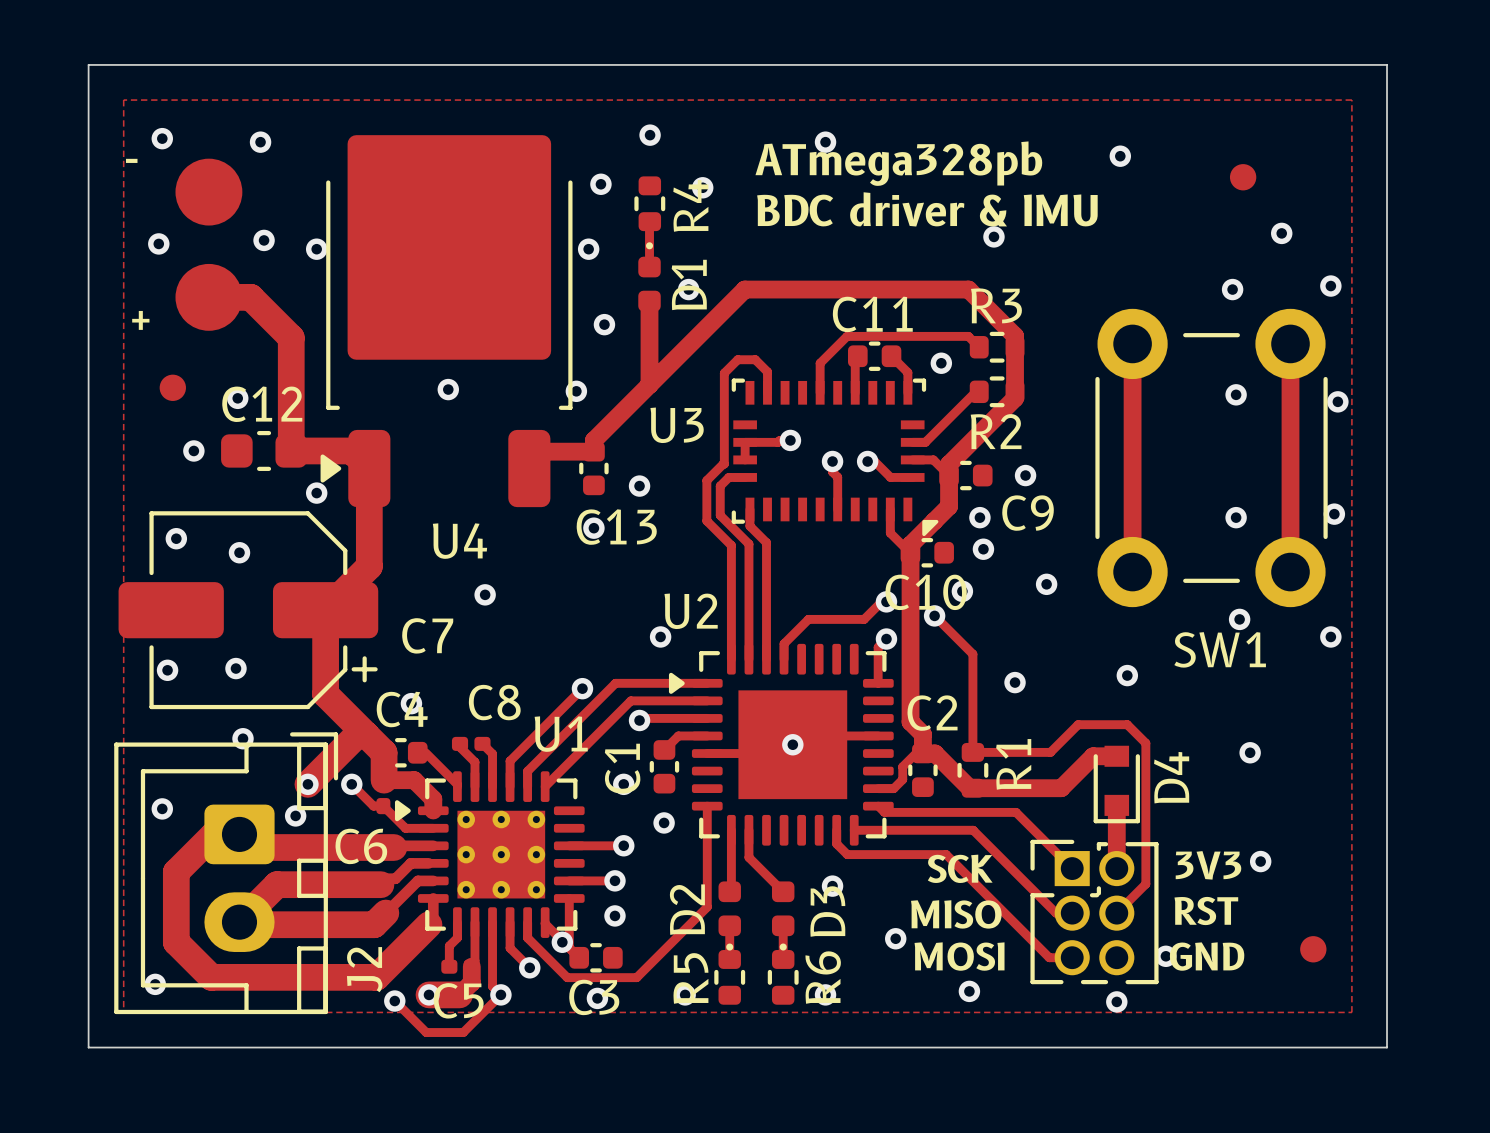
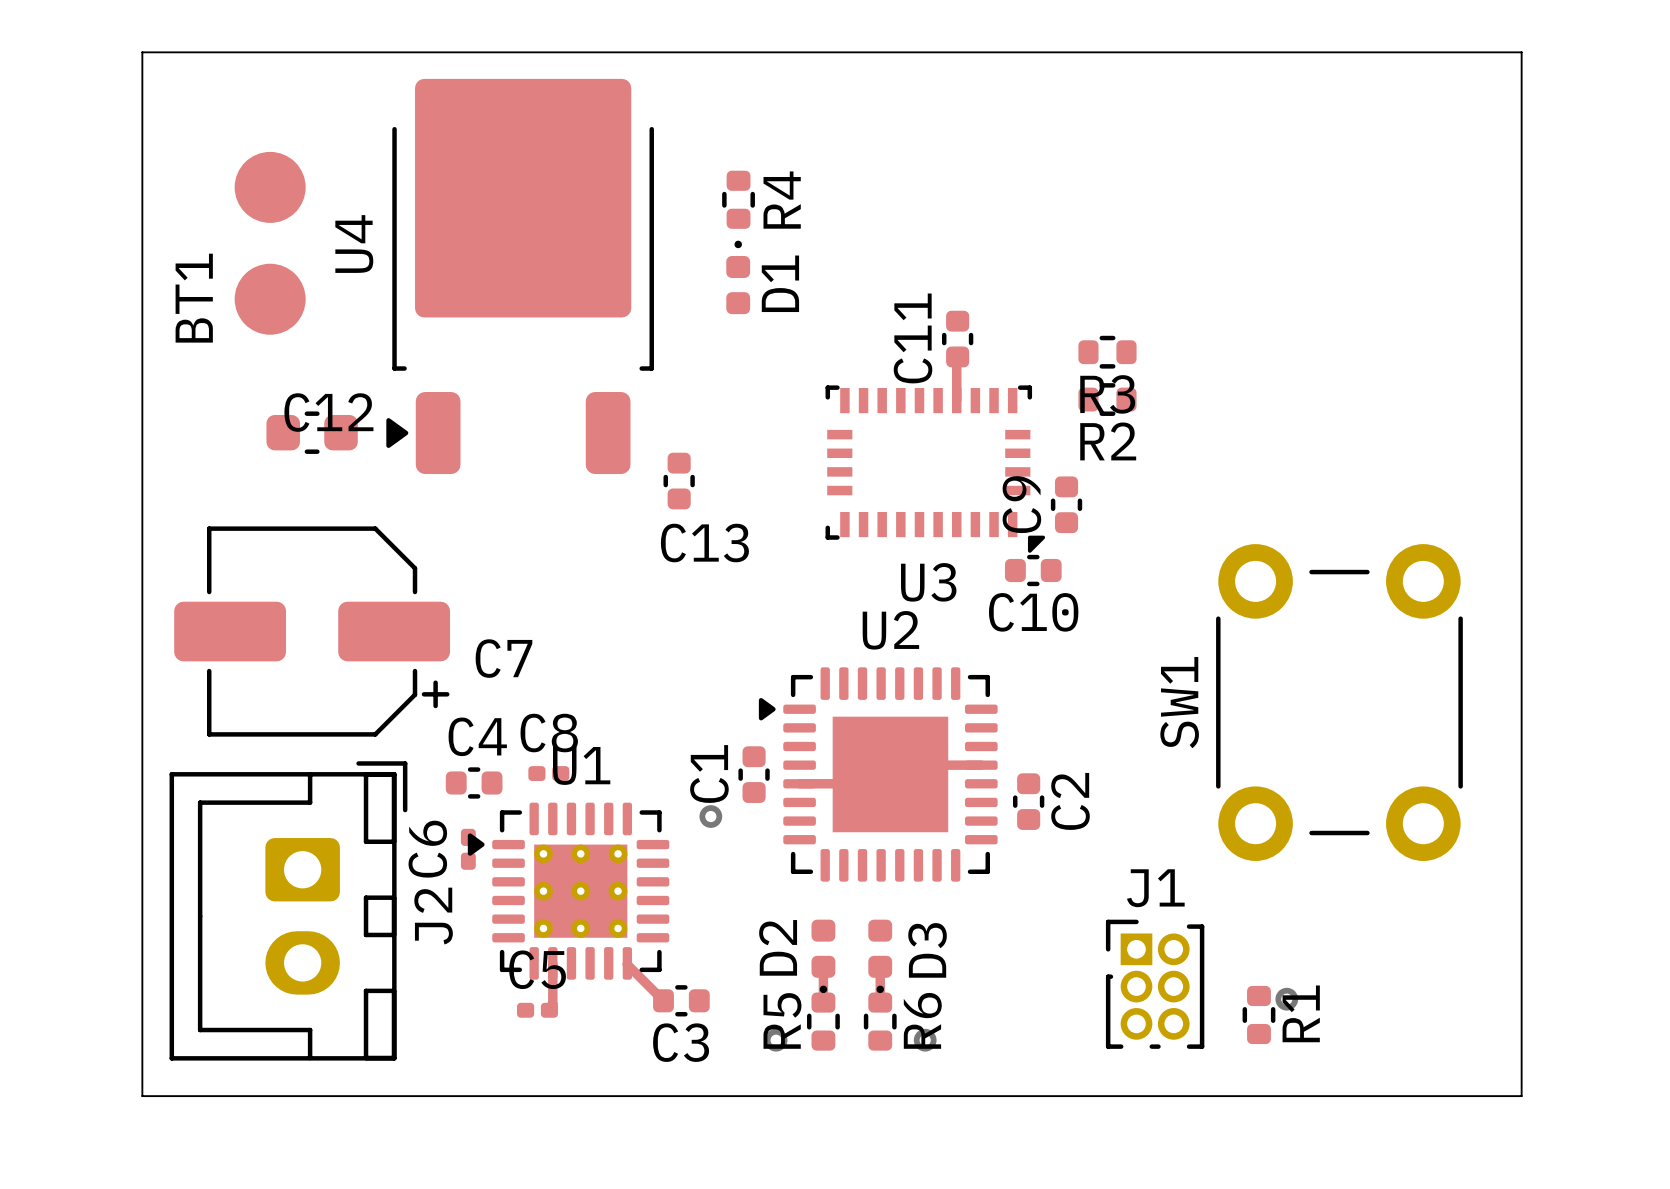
zone outline: (123, 100) (123, 1012) (1351, 1012) (1351, 100) (123, 100) -> none
via: (650, 135) -> none
via: (162, 138) -> none
via: (260, 142) -> none
via: (825, 142) -> none
via: (1120, 156) -> none
text: - (131, 160) -> none
text: ATmega328pb (898, 163) -> none
part: (1243, 177) -> none
via: (600, 184) -> none
via: (702, 187) -> none
text: BDC driver & IMU (927, 209) -> none
track: (649, 221) (649, 267) -> none
via: (1281, 233) -> none
via: (993, 236) -> none
via: (264, 240) -> none
via: (158, 243) -> none
via: (316, 249) -> none
via: (588, 249) -> none
via: (1330, 286) -> none
via: (688, 289) -> none
via: (1232, 289) -> none
track: (208, 297) (250, 297) (291, 337) (291, 450) (351, 450) (369, 468) (369, 566) (325, 610) (325, 694) (384, 752) (384, 780) -> none
BT1 name: none -> BT1 (194, 298)
track: (649, 301) (649, 384) -> none
R3 name position: R3 (996, 305) -> R3 (1107, 394)
text: + (140, 320) -> none
U4 position: (446, 321) -> (520, 276)
via: (604, 324) -> none
track: (1132, 343) (1132, 572) (1113, 591) -> none
track: (1290, 343) (1290, 572) -> none
track: (979, 347) (968, 336) (847, 336) (820, 363) (820, 392) -> none
C11 rotation: 0° (874, 356) -> 90° clockwise (957, 339)
track: (891, 356) (907, 372) (907, 392) -> none
via: (941, 363) -> none
part: (172, 387) -> none
via: (448, 389) -> none
via: (576, 391) -> none
track: (979, 391) (975, 391) (925, 442) (912, 442) -> none
track: (767, 392) (767, 371) (755, 359) (737, 359) (724, 373) (724, 464) (706, 480) (706, 520) (731, 545) (731, 659) -> none
via: (1236, 394) -> none
via: (237, 398) -> none
via: (1337, 401) -> none
U3 name position: U3 (677, 425) -> U3 (928, 582)
track: (790, 440) (745, 442) (745, 459) -> none
via: (790, 440) -> none
via: (193, 450) -> none
C12 position: (264, 450) -> (312, 432)
SW1 position: (1211, 457) -> (1339, 702)
track: (912, 459) (933, 459) (949, 475) -> none
track: (832, 461) (832, 472) (837, 477) (837, 509) -> none
via: (832, 461) -> none
track: (867, 461) (874, 461) (890, 477) (912, 477) -> none
via: (867, 461) -> none
track: (529, 468) (546, 451) (593, 451) (593, 440) (744, 289) (968, 289) (1015, 336) (1015, 398) (949, 464) (949, 506) (910, 544) (910, 721) (922, 734) (922, 753) -> none
C9 rotation: 0° (965, 475) -> 90° clockwise (1066, 504)
via: (1025, 475) -> none
track: (745, 477) (728, 477) (720, 486) (720, 515) (748, 544) (748, 659) -> none
via: (639, 486) -> none
via: (316, 493) -> none
track: (749, 509) (749, 526) (766, 542) (766, 659) -> none
track: (890, 509) (890, 533) (910, 553) -> none
via: (1334, 514) -> none
via: (979, 517) -> none
via: (1236, 517) -> none
via: (593, 528) -> none
via: (176, 538) -> none
U4 name rotation: 0° (459, 541) -> 90° counterclockwise (354, 244)
U4 name position: U4 (459, 541) -> U4 (354, 244)
via: (983, 549) -> none
via: (239, 552) -> none
via: (1046, 584) -> none
via: (962, 591) -> none
via: (485, 594) -> none
track: (886, 601) (881, 601) (864, 619) (808, 619) (784, 643) (784, 659) -> none
via: (886, 601) -> none
U2 name position: U2 (691, 611) -> U2 (890, 630)
track: (934, 615) (972, 654) (972, 752) (1050, 752) (1078, 724) (1127, 724) (1145, 743) (1145, 884) (1116, 913) -> none
via: (934, 615) -> none
via: (1239, 619) -> none
via: (660, 636) -> none
via: (1330, 636) -> none
track: (886, 639) (878, 647) (878, 683) -> none
via: (886, 639) -> none
SW1 name rotation: 0° (1220, 649) -> 90° counterclockwise (1179, 702)
SW1 name position: SW1 (1220, 649) -> SW1 (1179, 702)
via: (235, 668) -> none
via: (167, 670) -> none
via: (1127, 675) -> none
via: (1015, 682) -> none
track: (707, 683) (615, 683) (527, 771) (527, 786) -> none
track: (582, 688) (510, 761) (510, 786) -> none
via: (582, 688) -> none
track: (707, 700) (630, 700) (545, 786) -> none
C8 name position: C8 (494, 702) -> C8 (549, 733)
via: (411, 703) -> none
C2 name rotation: 0° (932, 713) -> 90° counterclockwise (1070, 801)
track: (707, 718) (641, 718) (639, 720) -> none
via: (639, 720) -> none
track: (366, 734) (357, 734) (307, 784) -> none
U1 name position: U1 (561, 734) -> U1 (581, 765)
track: (707, 735) (678, 735) (664, 749) -> none
via: (243, 738) -> none
track: (460, 743) (460, 747) (474, 762) (474, 786) -> none
track: (482, 743) (492, 753) (492, 786) -> none
via: (792, 744) -> none
track: (425, 752) (457, 786) -> none
via: (1250, 752) -> none
track: (922, 753) (916, 753) (902, 766) (902, 779) (893, 788) (878, 788) -> none
track: (922, 753) (935, 753) (969, 788) (1061, 788) (1093, 756) (1116, 756) -> none
R1 name position: R1 (1013, 764) -> R1 (1301, 1013)
C1 position: (664, 766) -> (754, 774)
R1 position: (972, 770) -> (1258, 1015)
track: (383, 780) (414, 780) (433, 799) (433, 810) -> none
via: (307, 784) -> none
track: (351, 784) (373, 806) (383, 806) (405, 828) (433, 828) -> none
via: (351, 784) -> none
D4: (1116, 784) -> none
C6 position: (383, 794) -> (468, 849)
track: (1116, 805) (1116, 868) -> none
track: (707, 806) (707, 907) (636, 977) (567, 977) (527, 937) (527, 922) -> none
track: (878, 806) (884, 812) (1016, 812) (1072, 868) -> none
via: (162, 808) -> none
via: (295, 815) -> none
via: (664, 822) -> none
track: (731, 830) (731, 890) (729, 891) -> none
track: (748, 830) (748, 857) (783, 891) -> none
track: (836, 830) (836, 843) (847, 854) (946, 854) (1049, 957) (1072, 957) -> none
track: (854, 830) (973, 830) (1056, 913) (1072, 913) -> none
track: (433, 845) (252, 847) (239, 834) (213, 834) (176, 872) (176, 942) (211, 977) (376, 977) (433, 920) (433, 898) -> none
track: (569, 845) (623, 845) -> none
via: (623, 845) -> none
C6 name rotation: 0° (361, 846) -> 90° counterclockwise (427, 849)
via: (1260, 861) -> none
track: (428, 863) (410, 863) (395, 878) (386, 878) -> none
text: 3V3 (1208, 865) -> none
text: SCK (960, 868) -> none
track: (433, 880) (417, 880) (385, 913) -> none
track: (569, 880) (614, 880) -> none
via: (614, 880) -> none
track: (380, 884) (276, 884) (239, 922) (242, 924) (374, 924) (385, 913) -> none
via: (832, 886) -> none
track: (569, 898) (569, 947) -> none
part: (1094, 911) -> none
text: RST (1206, 911) -> none
text: MISO (956, 914) -> none
via: (614, 915) -> none
track: (457, 922) (457, 937) (449, 946) (449, 966) -> none
track: (492, 922) (492, 986) (500, 994) (463, 1032) (426, 1032) (394, 1001) -> none
track: (510, 922) (510, 948) (529, 967) -> none
via: (895, 938) -> none
via: (562, 942) -> none
J1: none -> (1155, 984)
part: (1313, 949) -> none
text: MOSI (959, 956) -> none
text: GND (1207, 956) -> none
track: (471, 966) (471, 982) (459, 994) (428, 994) -> none
via: (529, 967) -> none
J2 name position: J2 (364, 969) -> J2 (433, 916)
via: (155, 984) -> none
via: (969, 991) -> none
via: (428, 994) -> none
via: (500, 994) -> none
via: (597, 998) -> none
C5 name position: C5 (458, 1000) -> C5 (537, 969)
via: (394, 1001) -> none
via: (1116, 1001) -> none

